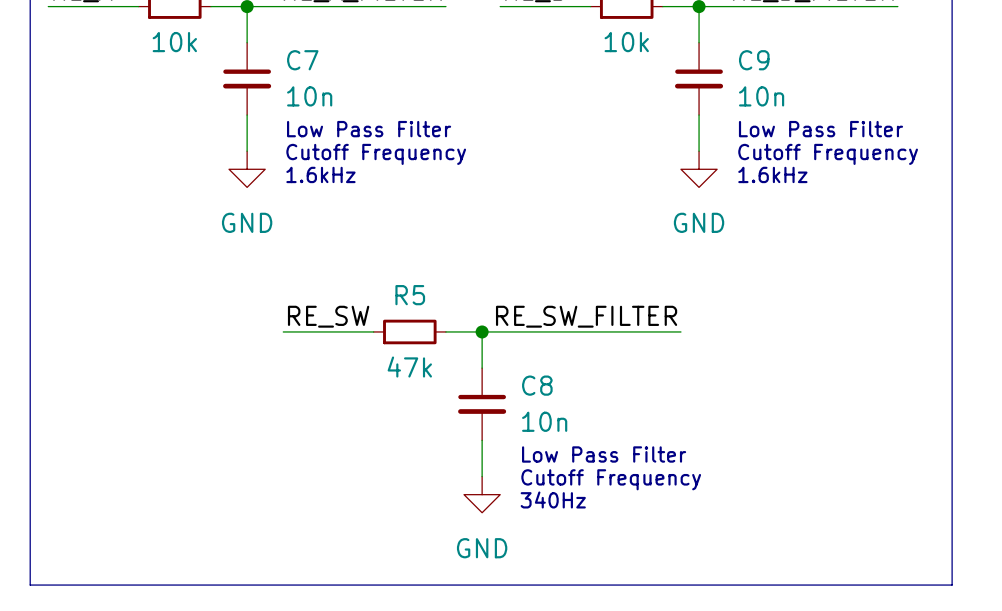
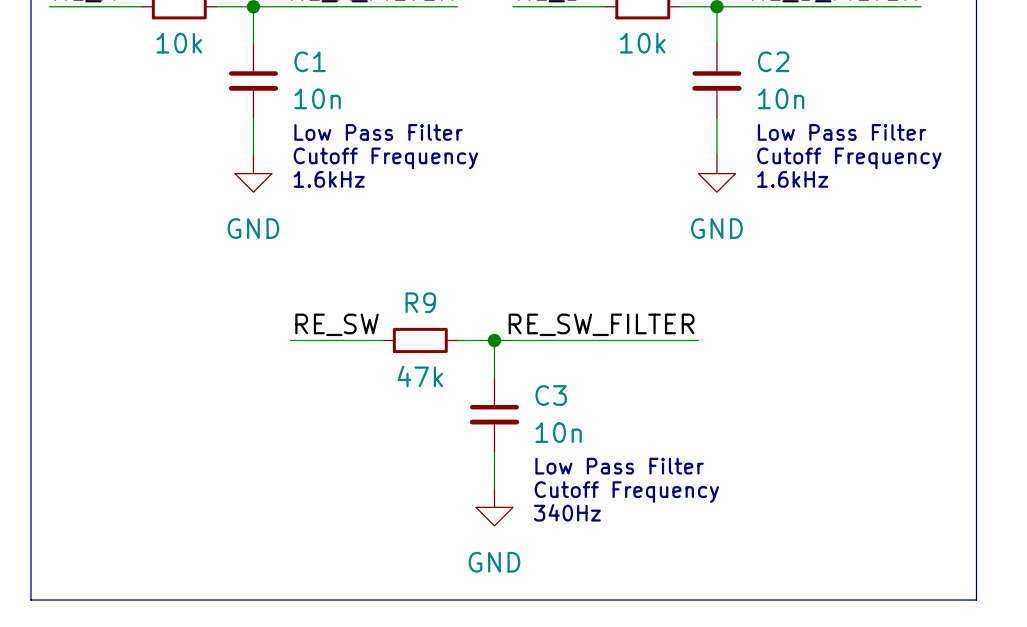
C7 name: C7 (302, 60) -> C1 (310, 61)
C9 name: C9 (754, 60) -> C2 (773, 61)
R5 name: R5 (410, 295) -> R9 (420, 302)
C8 name: C8 (537, 385) -> C3 (551, 395)

